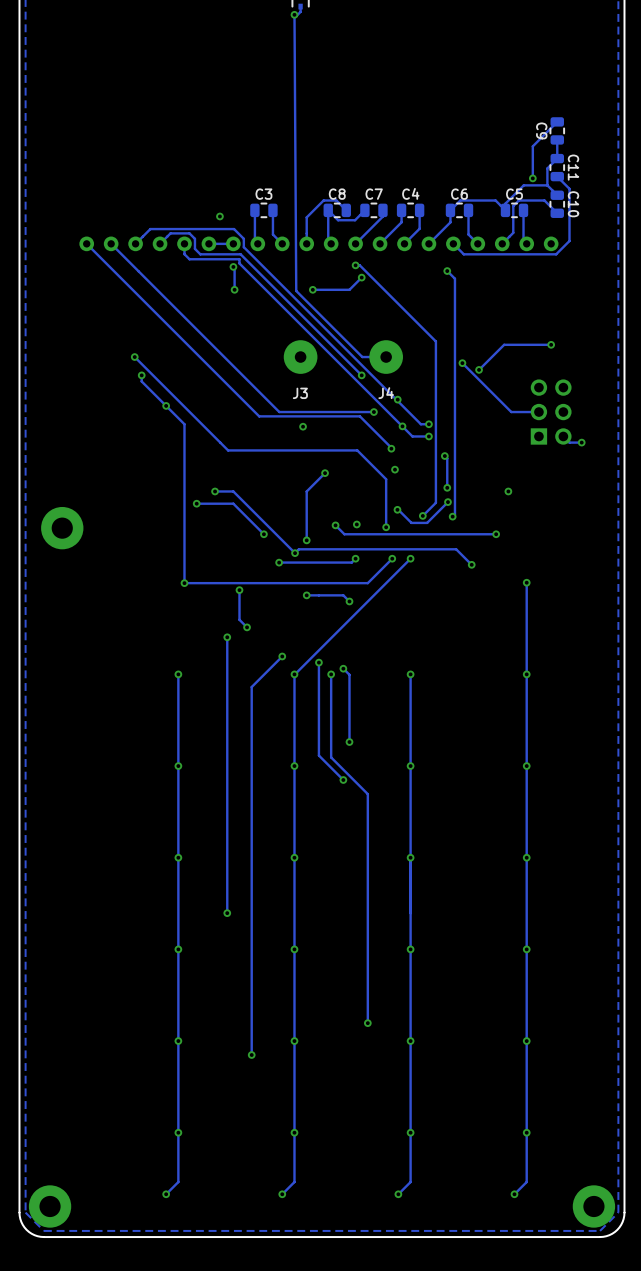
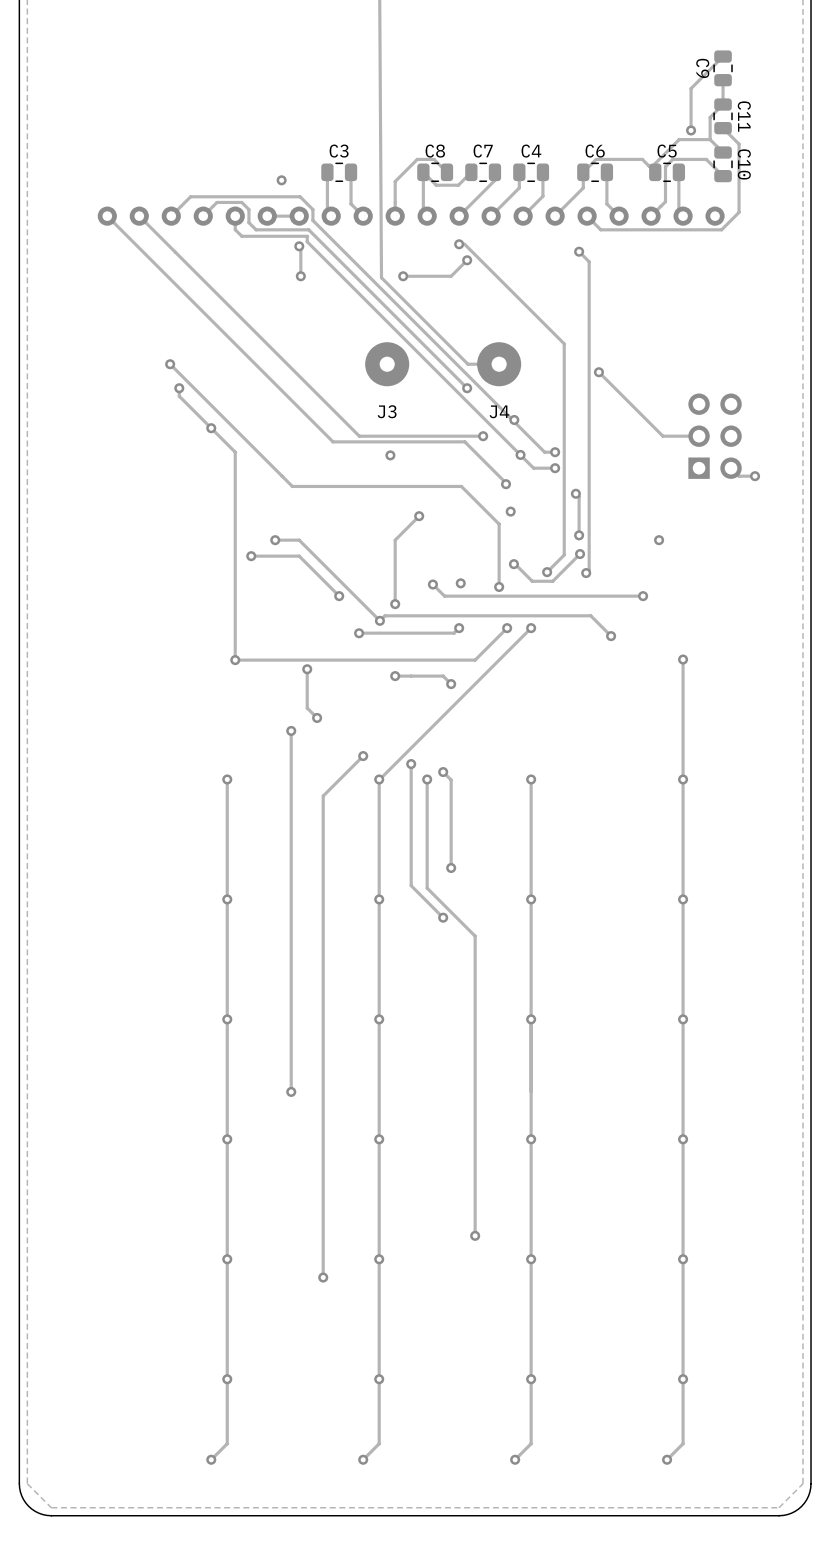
track: (551, 344) (504, 344) (479, 369) -> none
via: (551, 344) -> none
via: (479, 369) -> none
part: (62, 528) -> none
part: (50, 1206) -> none
part: (593, 1206) -> none

